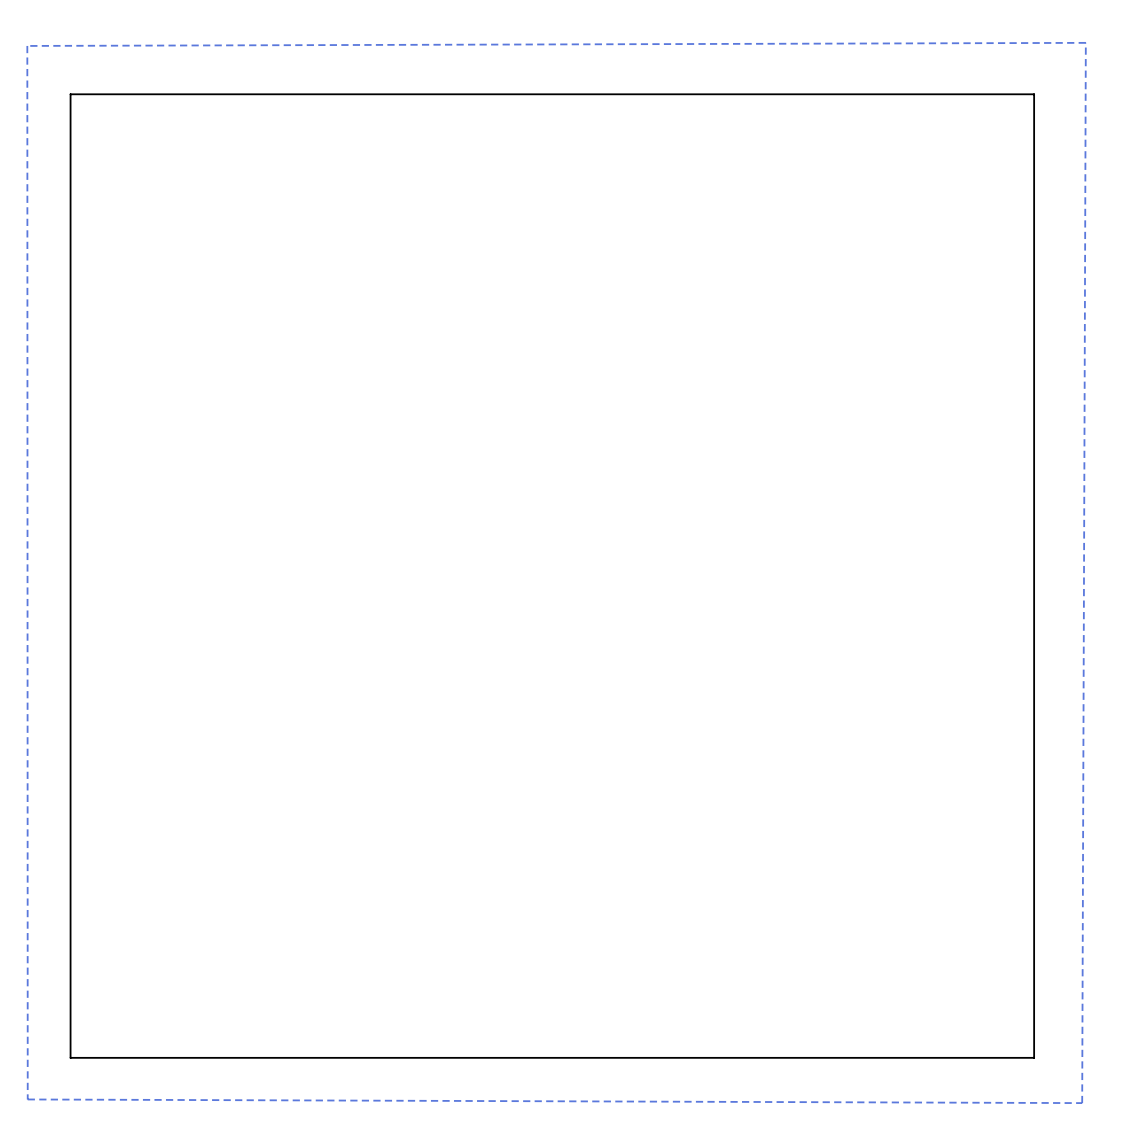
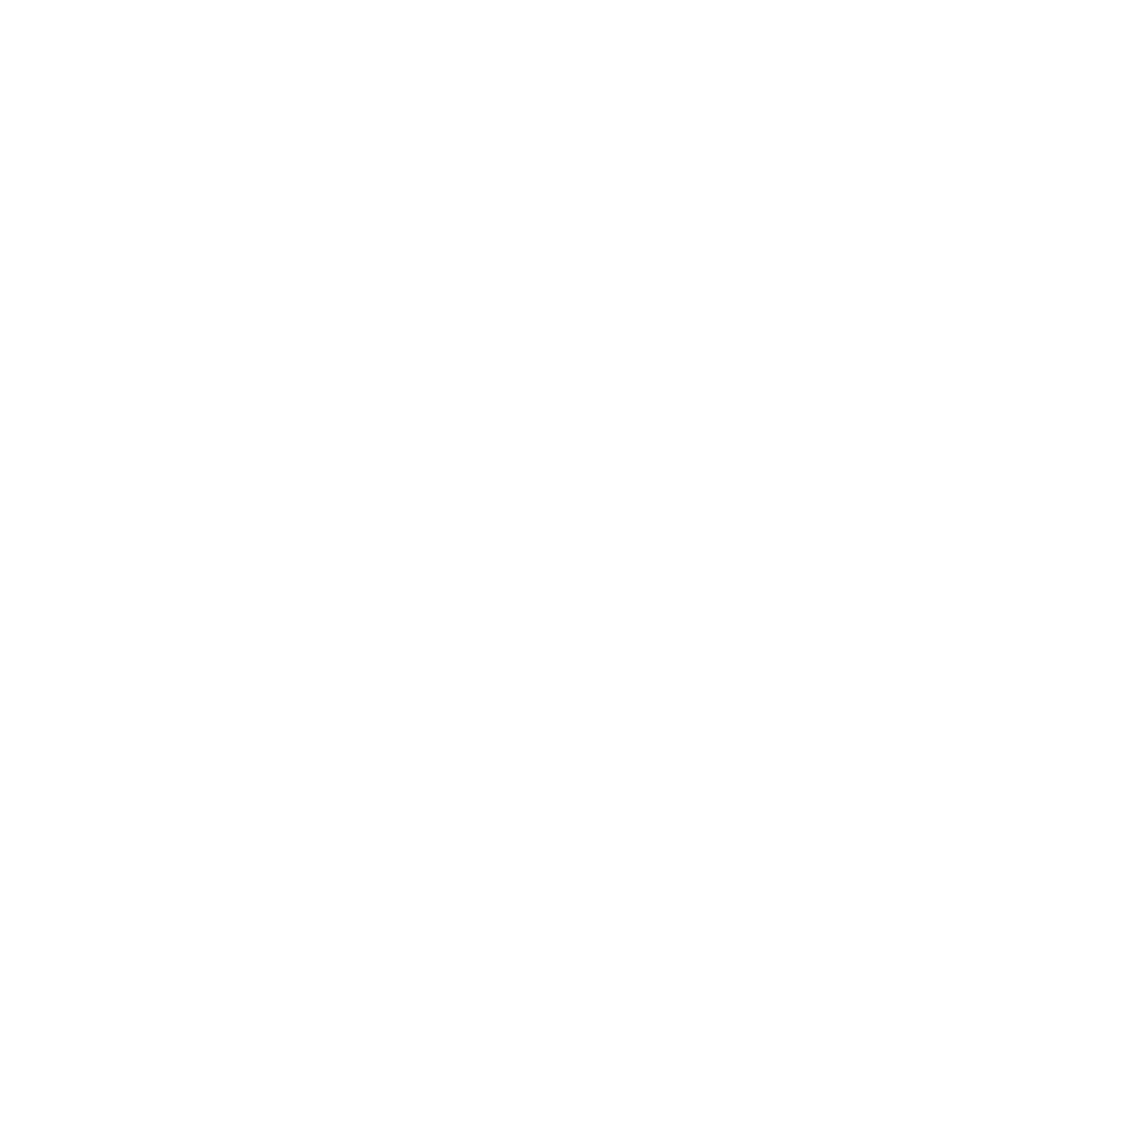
zone outline: (1085, 42) (27, 45) (27, 1099) (1082, 1103) (1085, 42) -> none
board edge: (1034, 94) (70, 94) (70, 1057) (1034, 1057) (1034, 94) -> none

